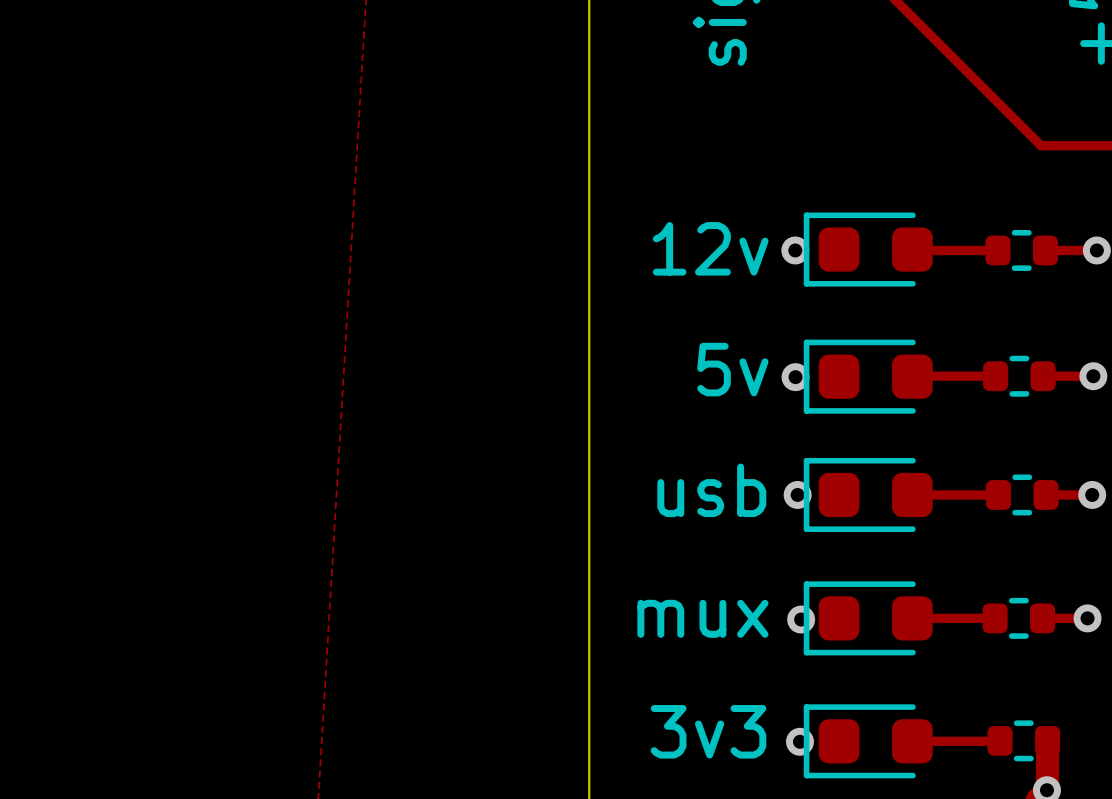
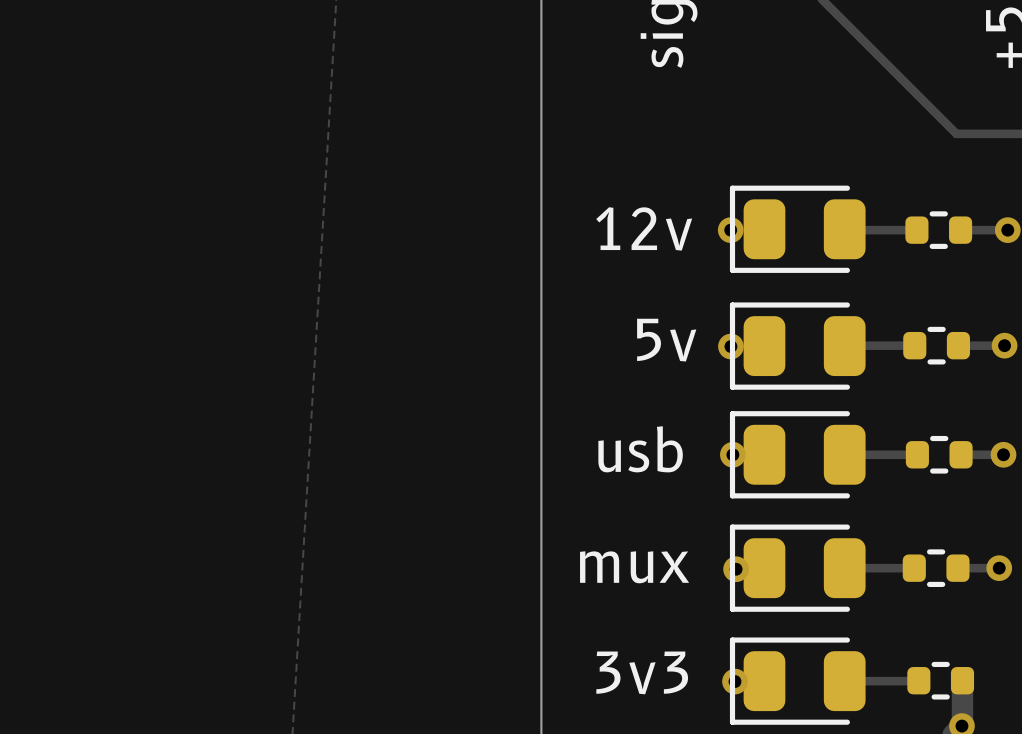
part footprint: [803, 212, 933, 287] -> [729, 185, 866, 273]
part footprint: [803, 339, 933, 414] -> [729, 302, 866, 390]
part footprint: [803, 457, 933, 532] -> [729, 411, 866, 499]
part footprint: [803, 581, 933, 656] -> [729, 524, 866, 612]
part footprint: [803, 704, 933, 779] -> [729, 637, 866, 725]

